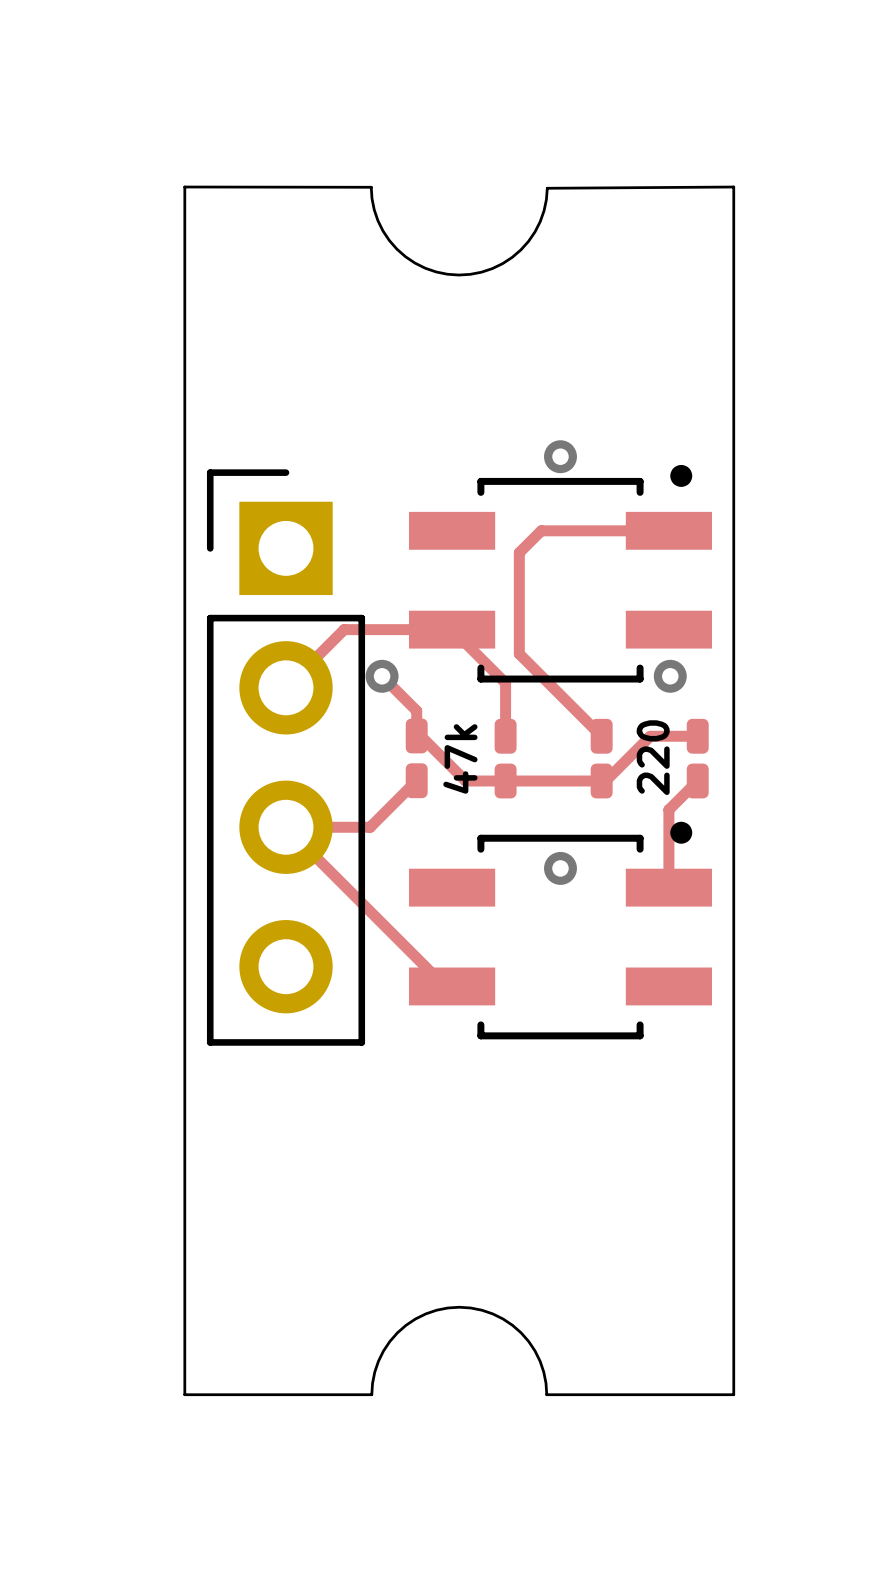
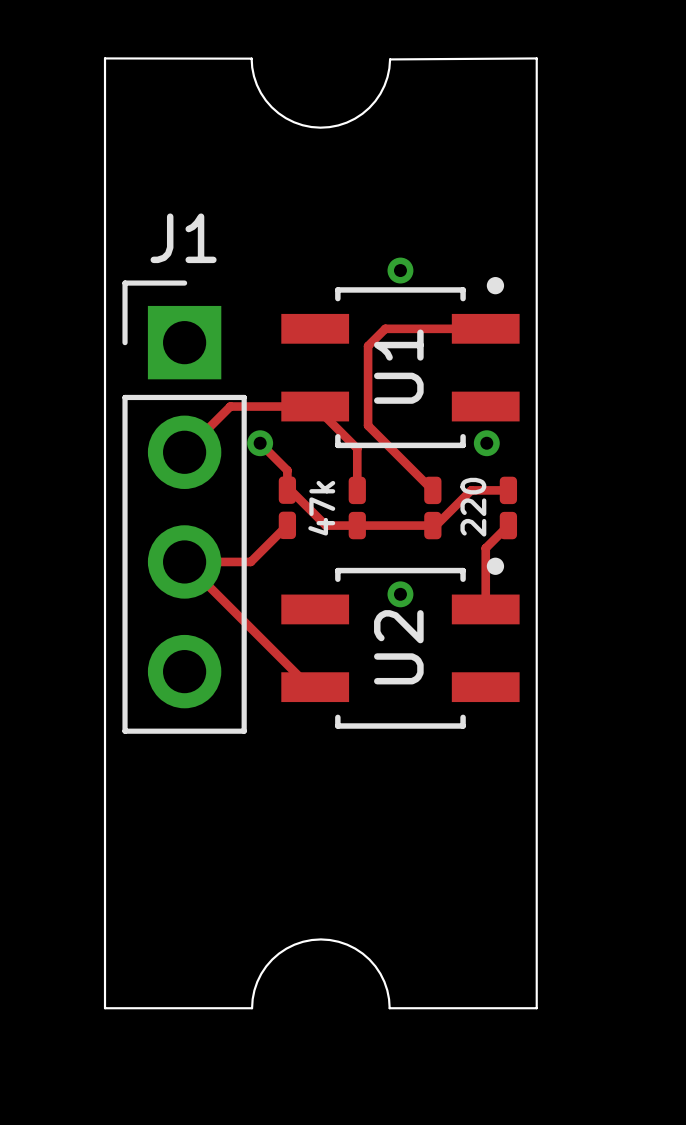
J1 name: none -> J1 (183, 238)
U1 name: none -> U1 (398, 366)
U2 name: none -> U2 (398, 647)

